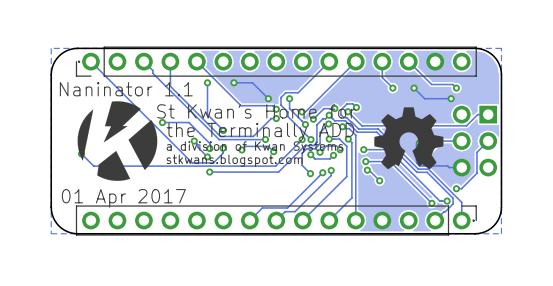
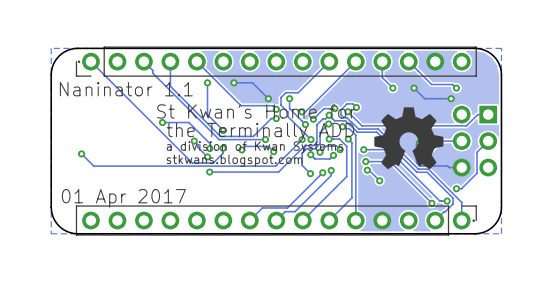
drawing: [77, 101, 158, 181] -> none

